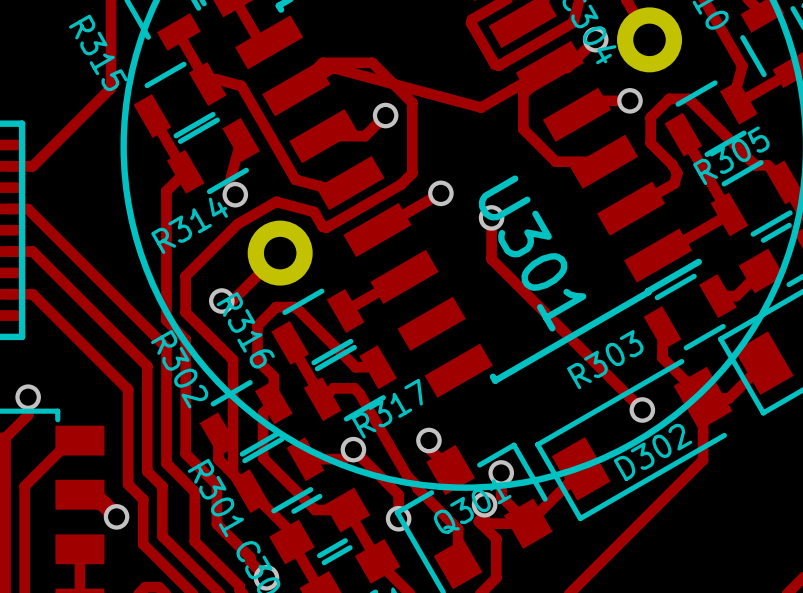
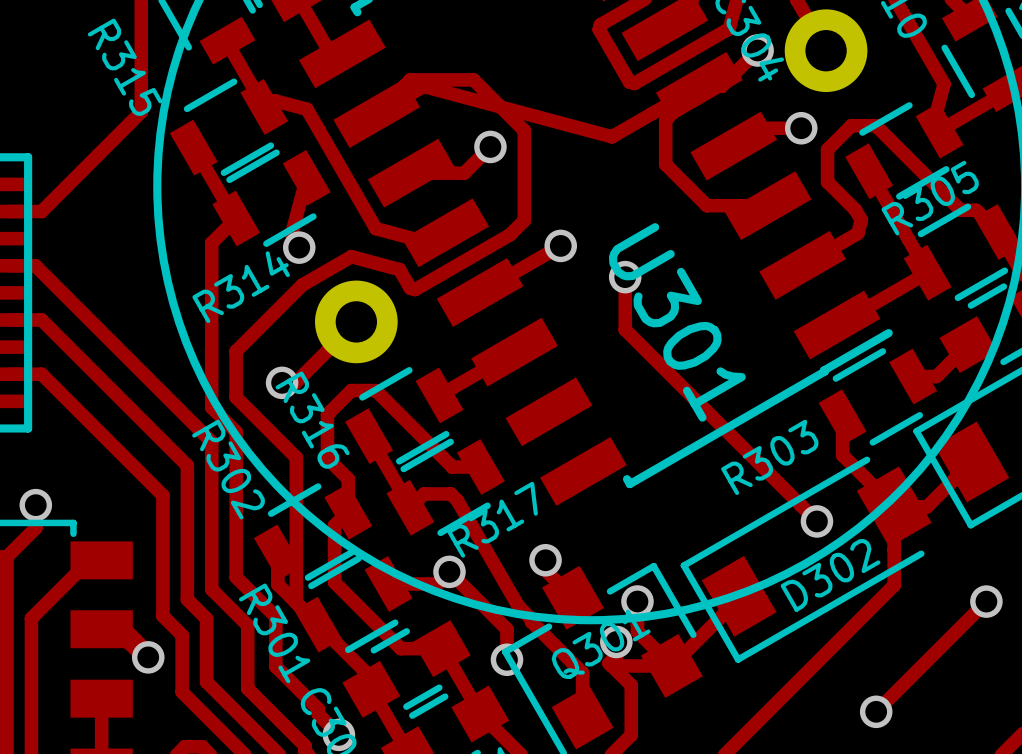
track: none -> (986, 601) (876, 711)
via: none -> (986, 601)
via: none -> (876, 711)

